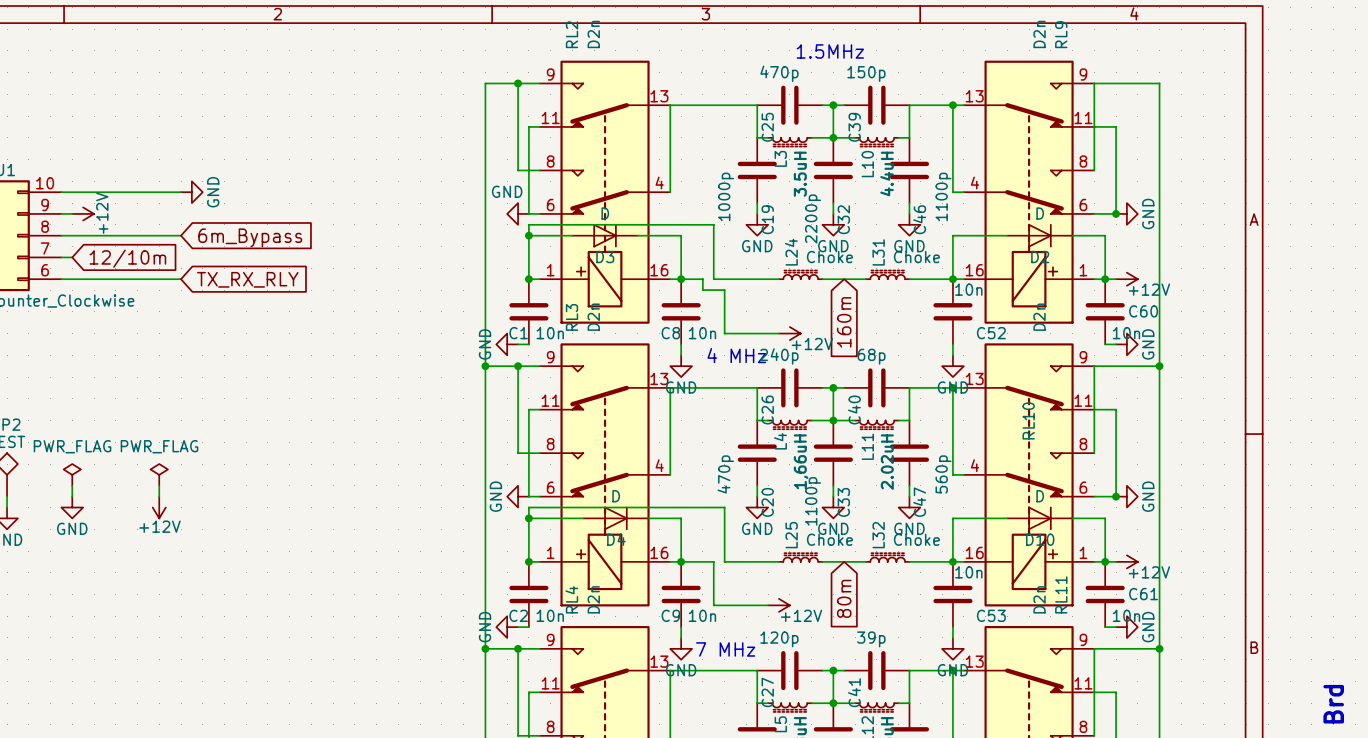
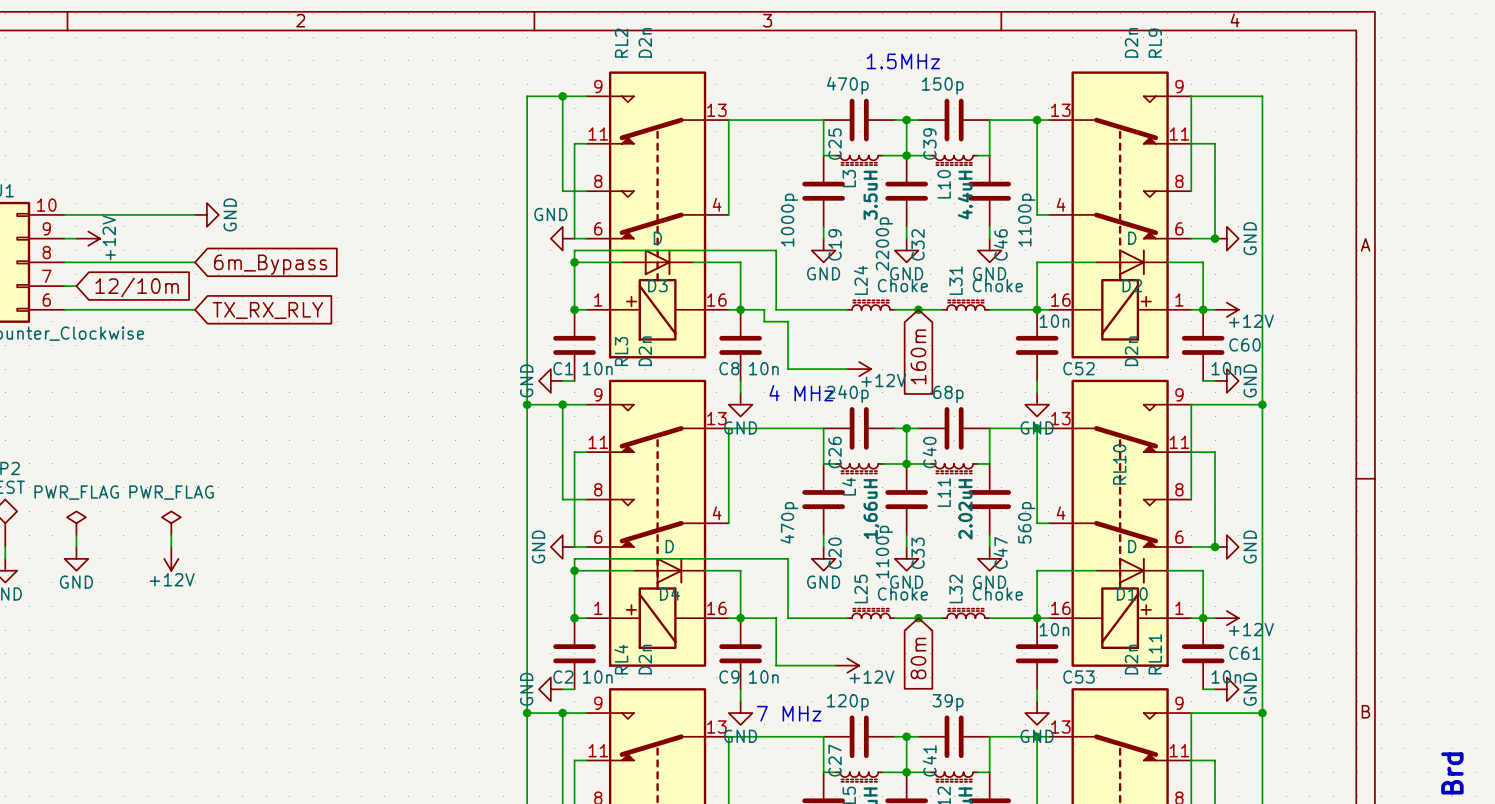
junction: none -> (918, 309)
junction: none -> (918, 618)

